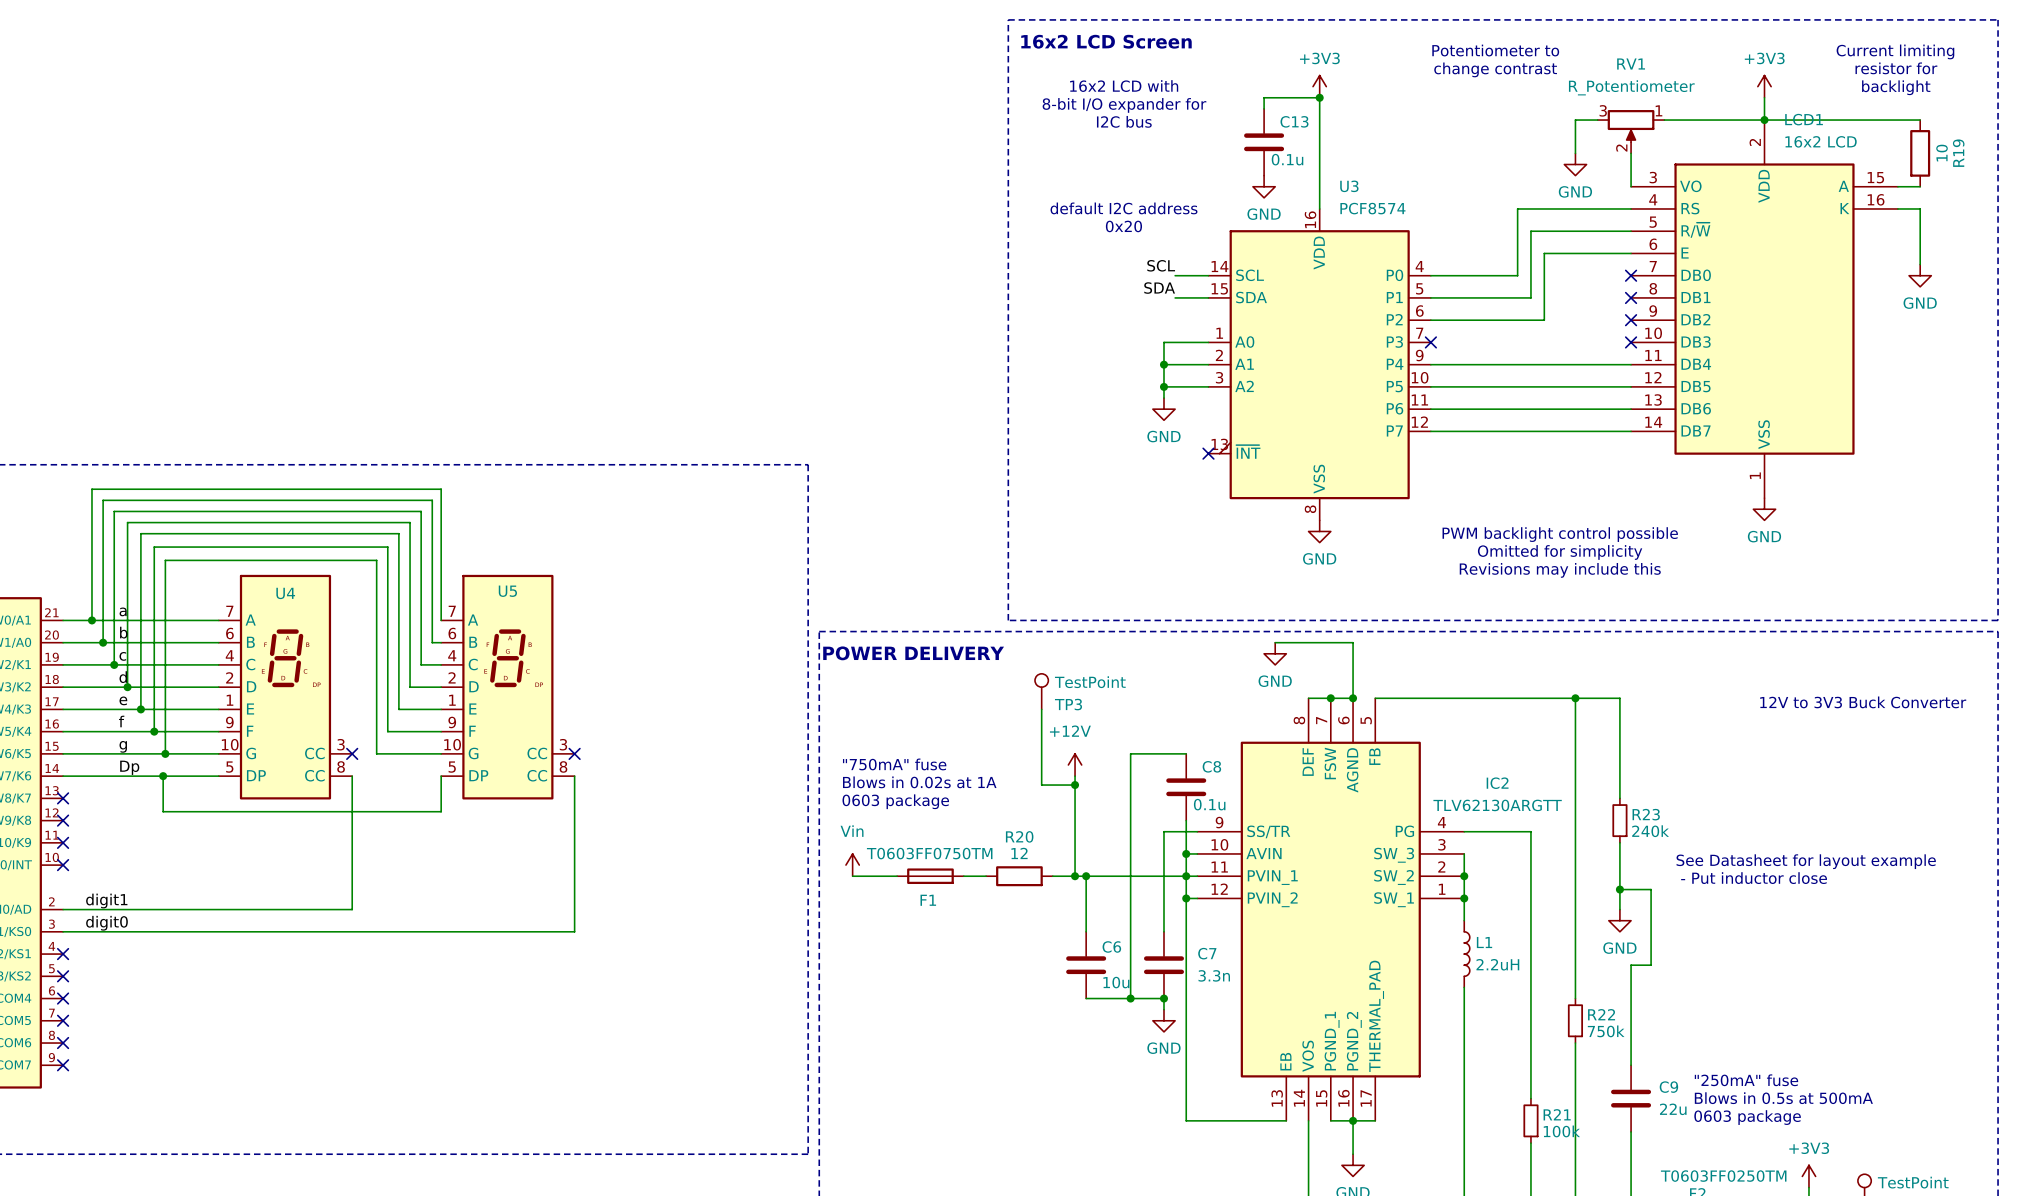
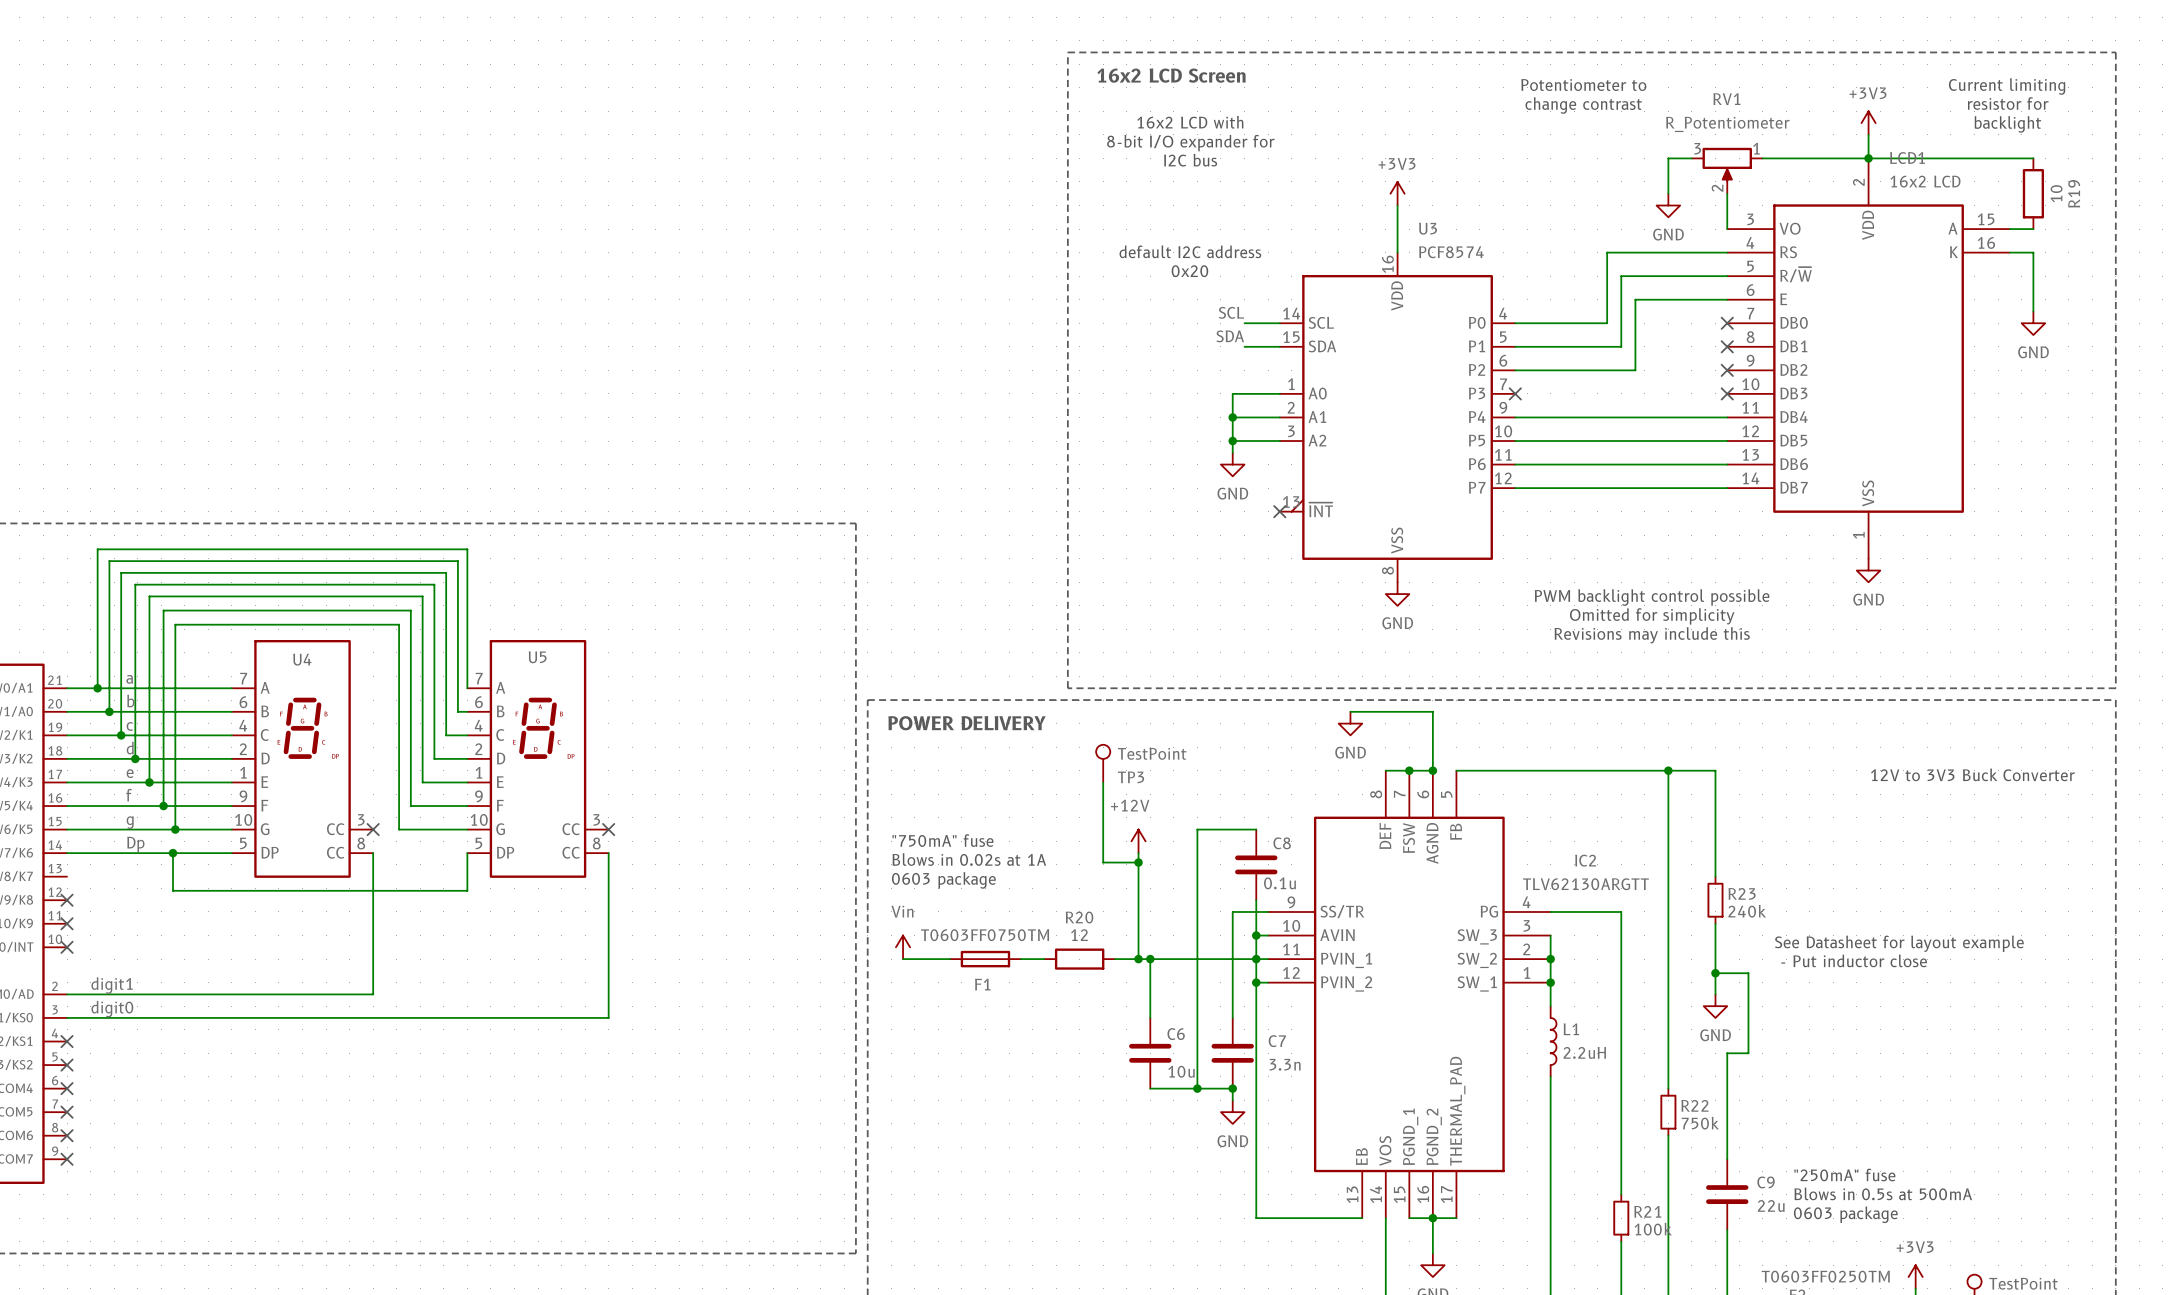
power symbol position: +3V3 (1319, 86) -> +3V3 (1397, 193)
junction: (1319, 97) -> none
wire: (1264, 108) (1264, 97) (1319, 97) (1319, 164) -> none
C13: 0.1u (1264, 142) -> none
power symbol: GND (1264, 186) -> none
no-connect mark: (63, 798) -> none

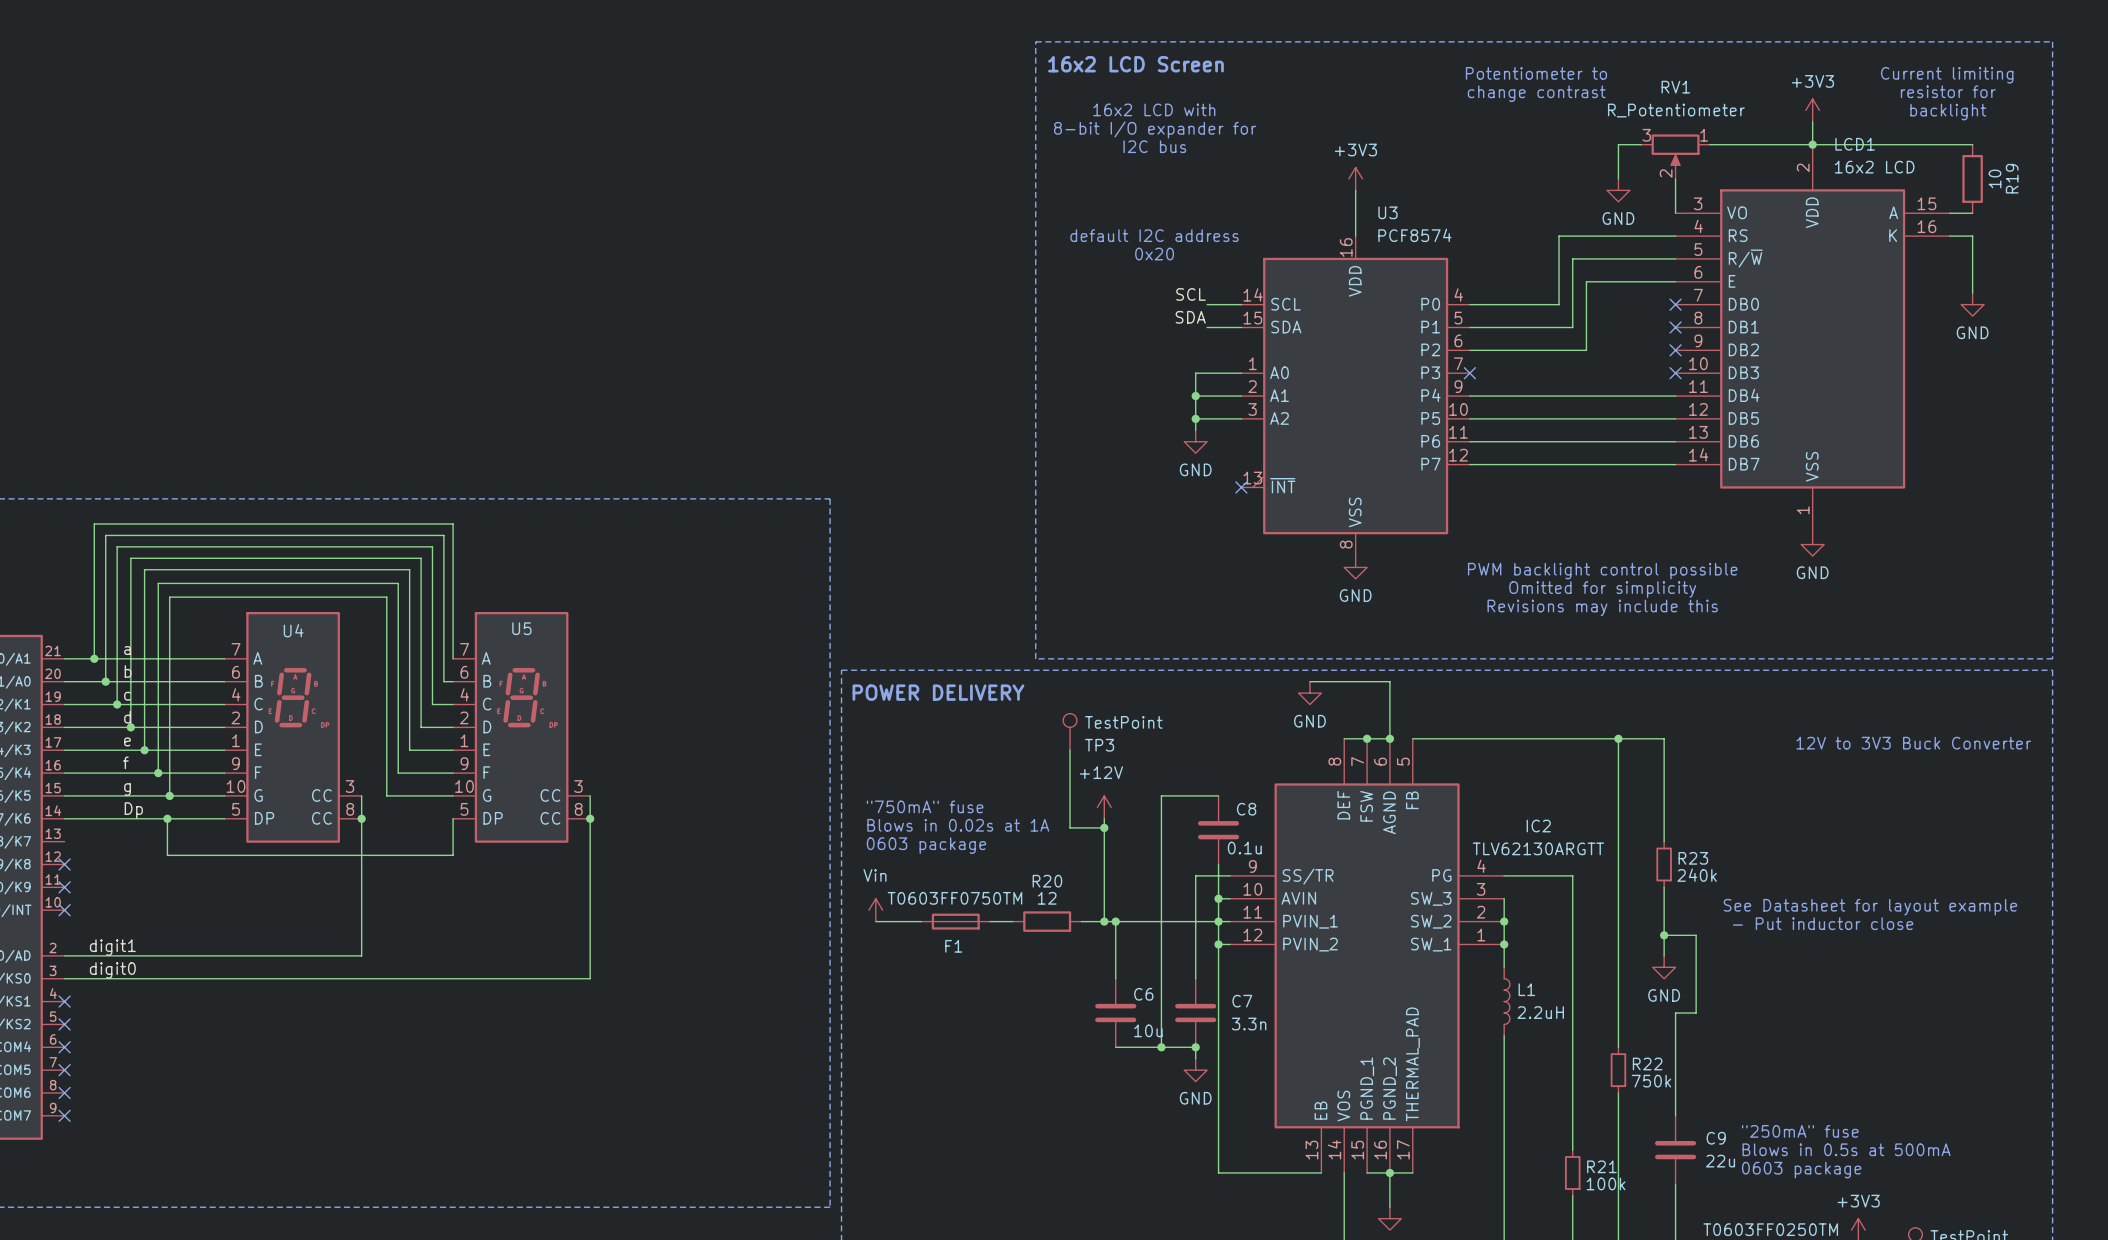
wire: none -> (361, 795) (361, 818)
no-connect mark: (373, 829) -> none
wire: none -> (590, 795) (590, 818)
no-connect mark: (608, 829) -> none
junction: none -> (361, 818)
junction: none -> (590, 818)

